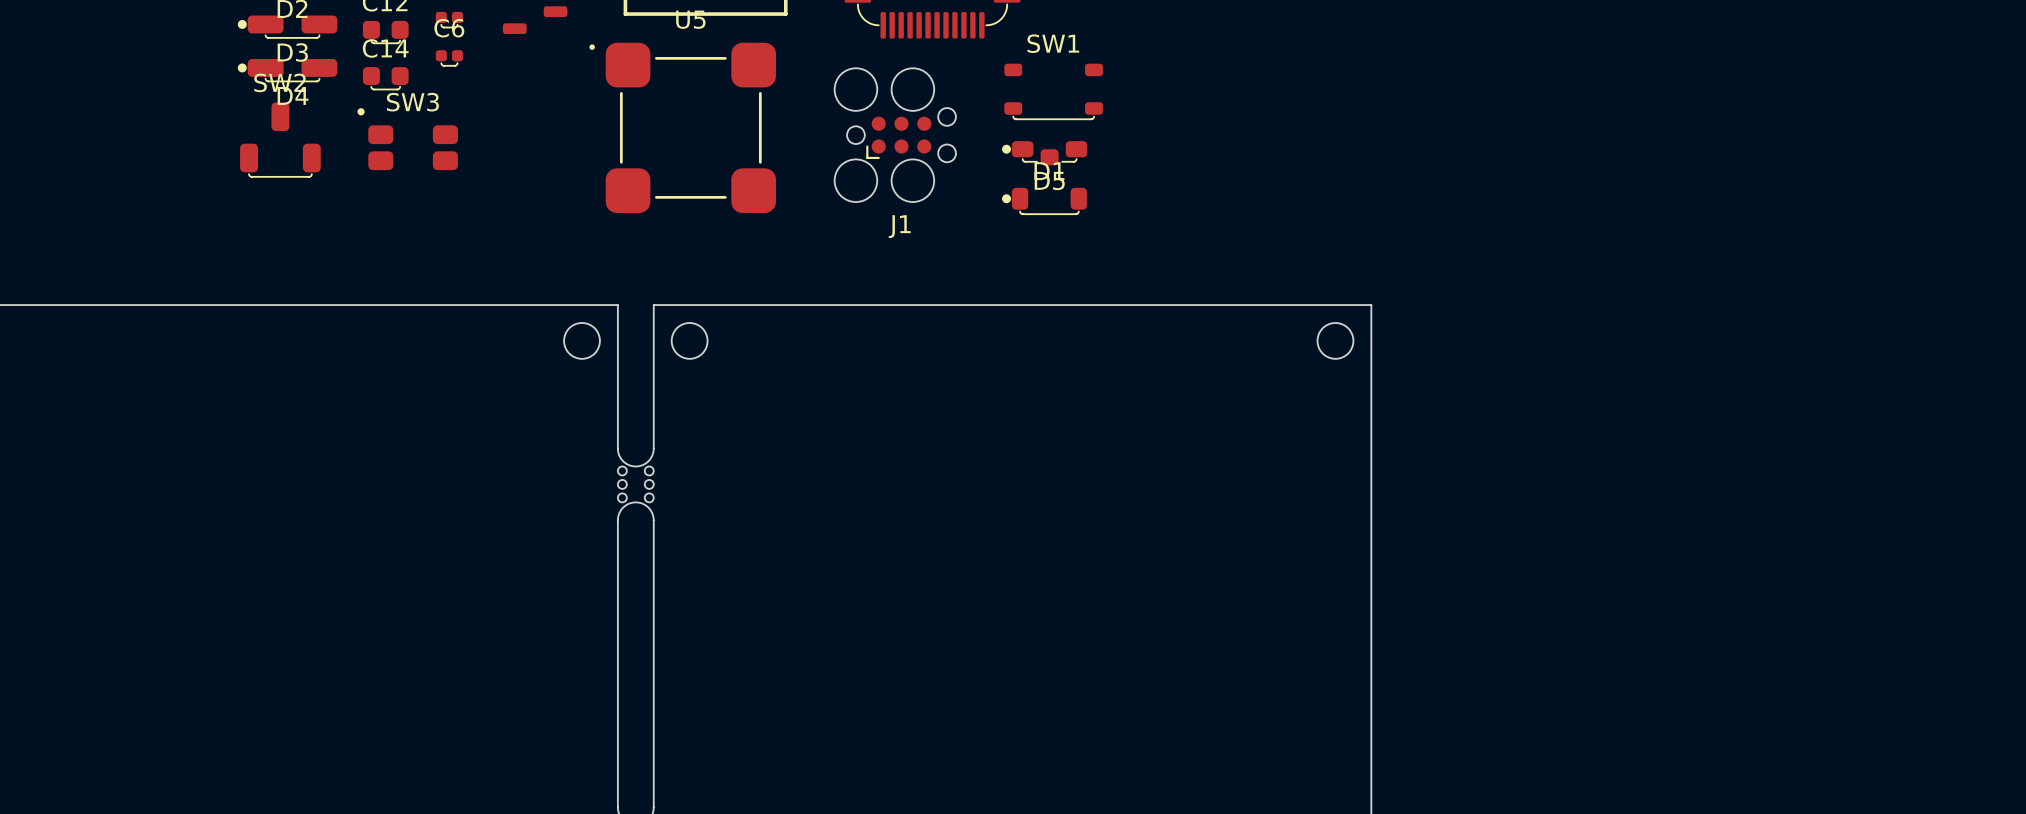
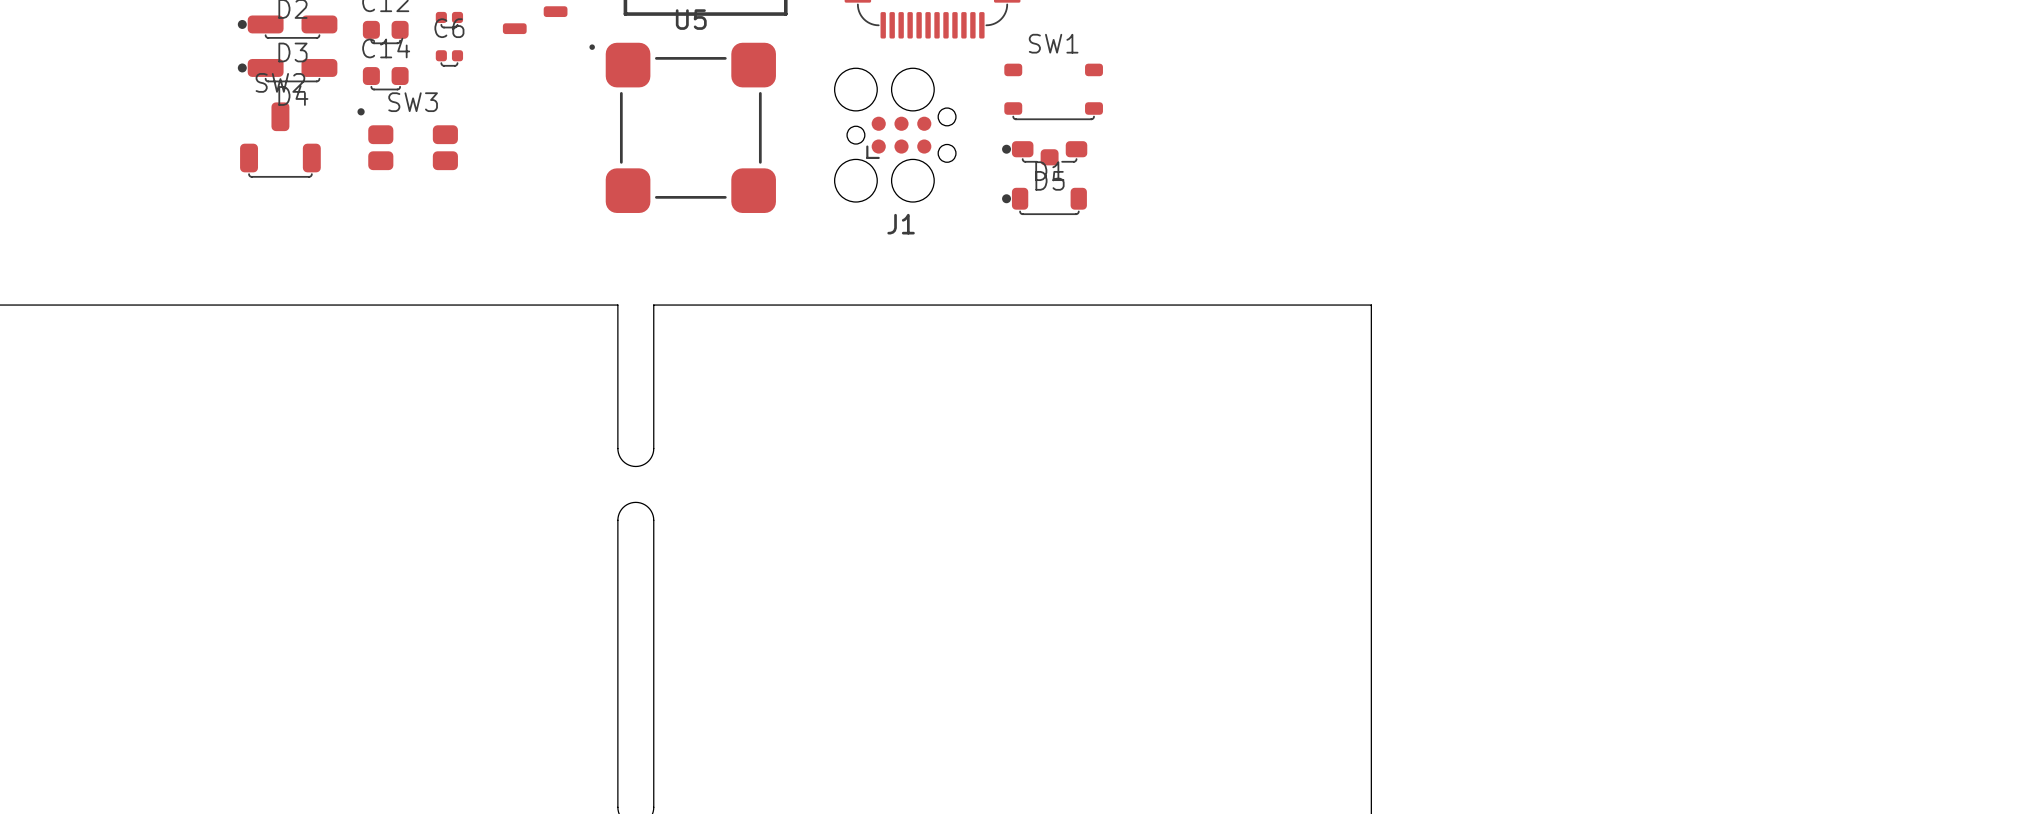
round board edge: [563, 322, 601, 360] -> none
round board edge: [671, 322, 709, 360] -> none
round board edge: [1317, 322, 1354, 360] -> none
part: (635, 484) -> none

